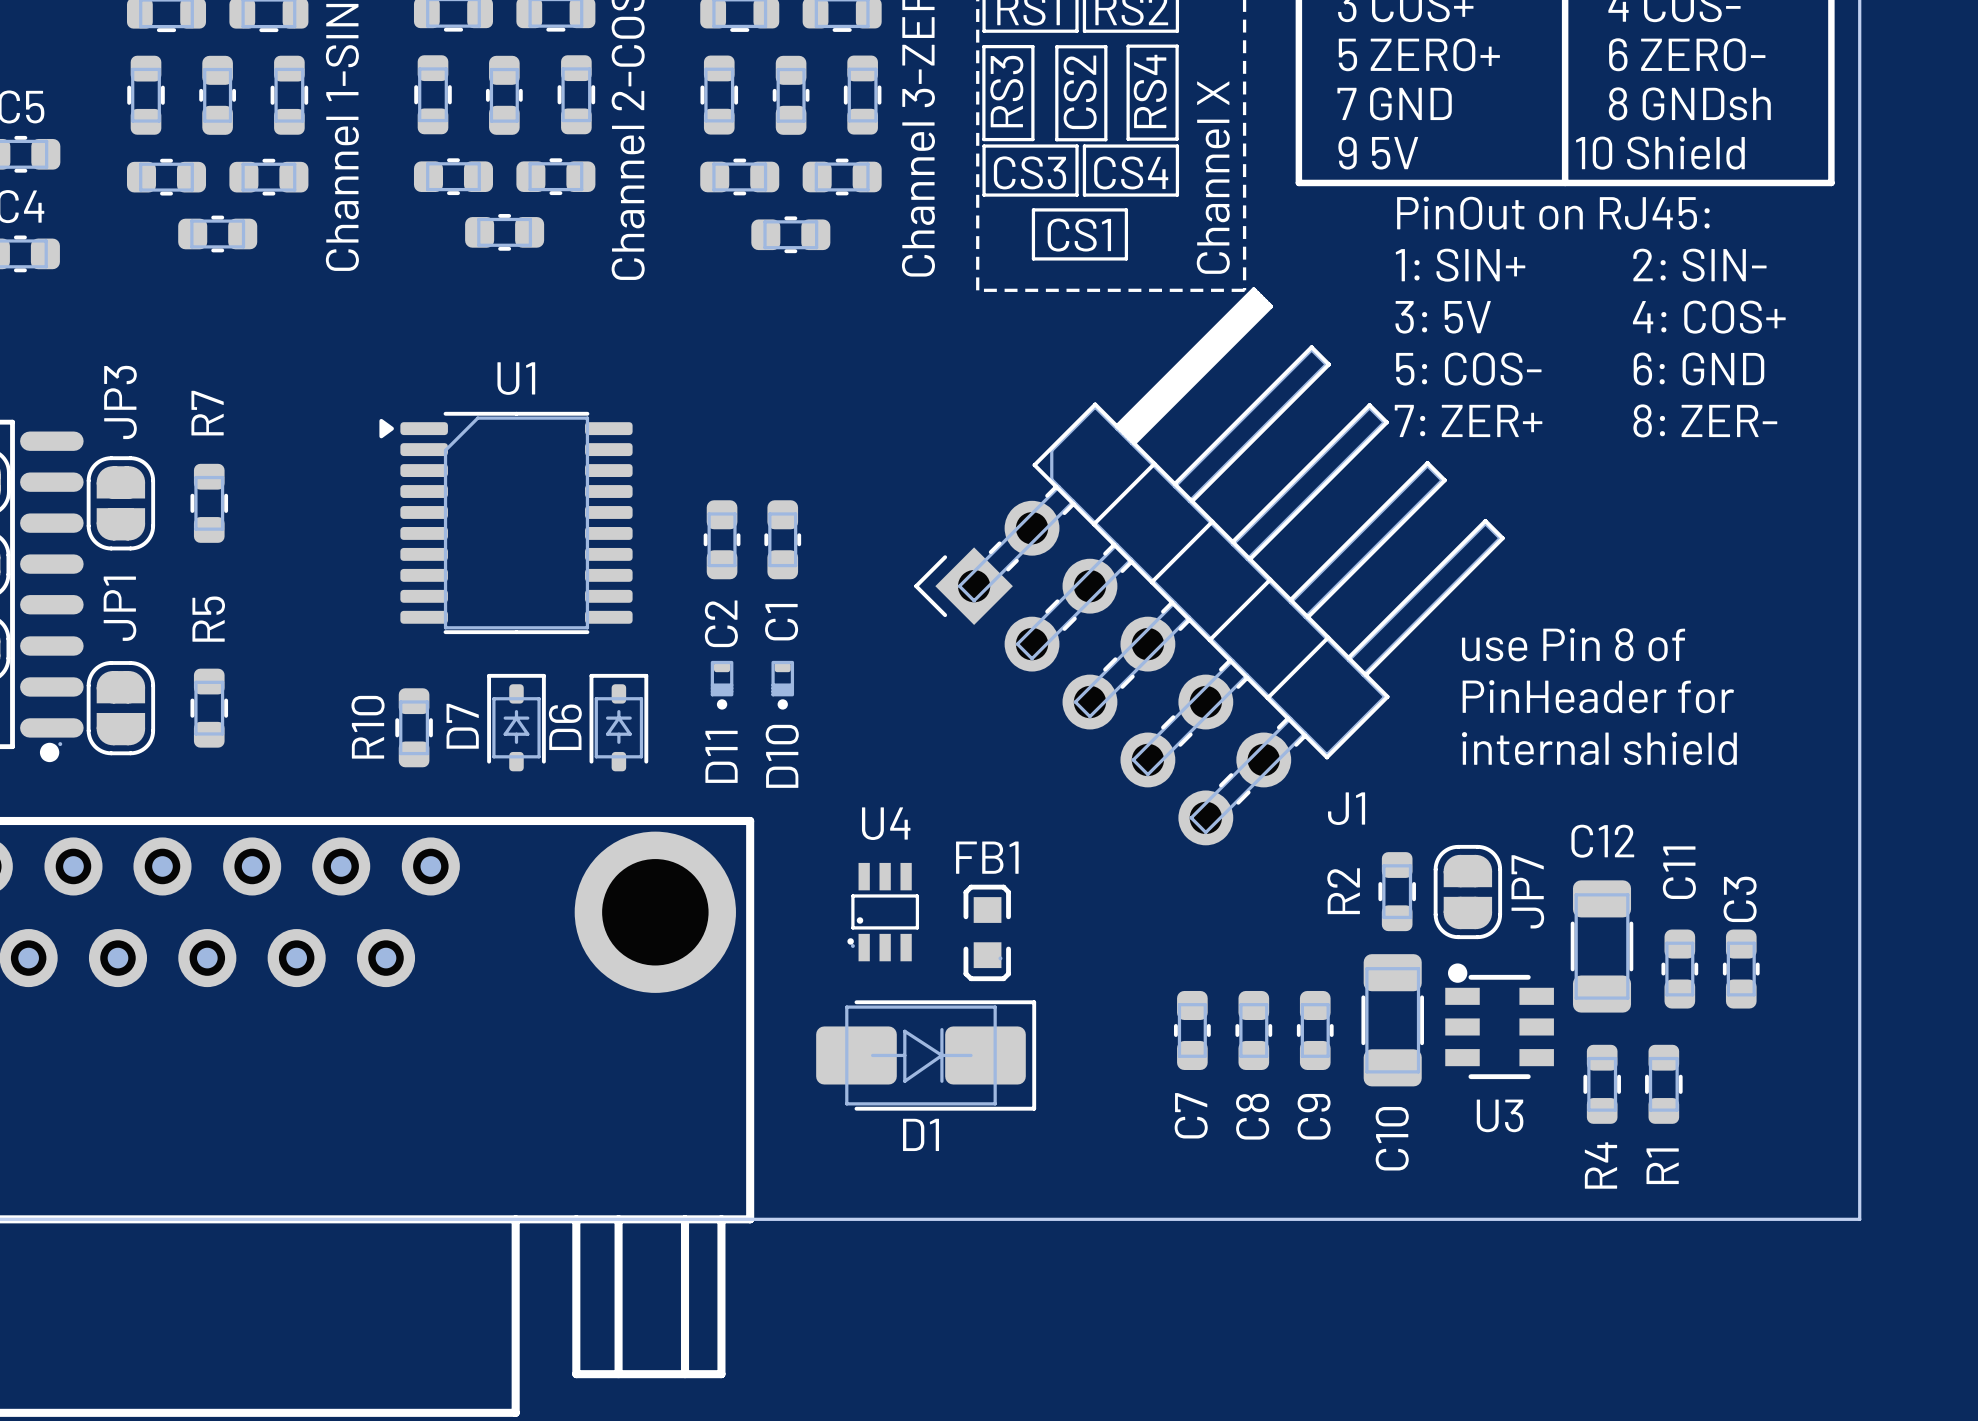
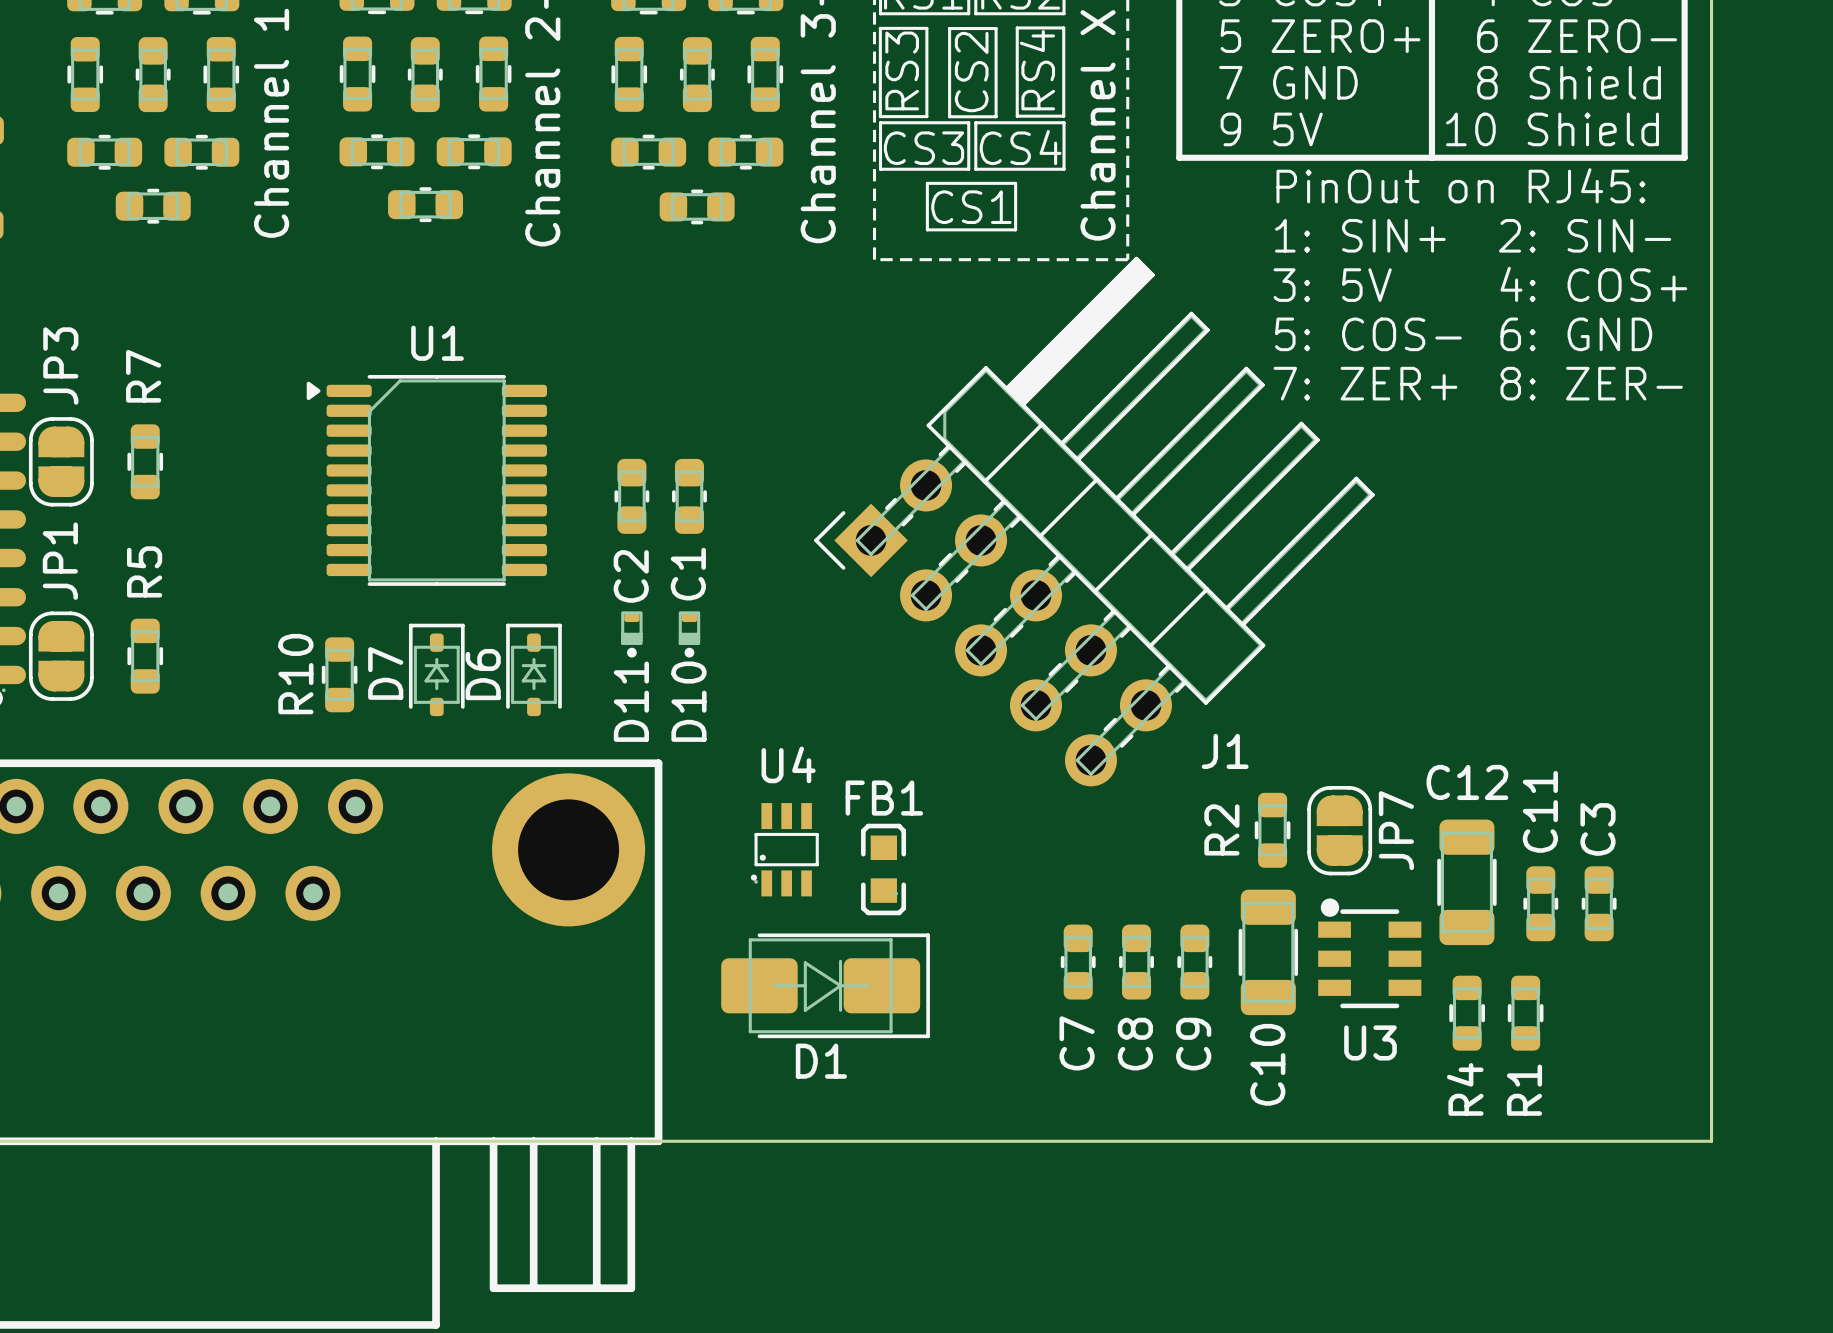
text: 8 GNDsh (1689, 103) -> 8 Shield (1569, 82)
text: use Pin 8 of (1573, 644) -> none
text: PinHeader for (1598, 696) -> none
text: internal shield (1599, 748) -> none

